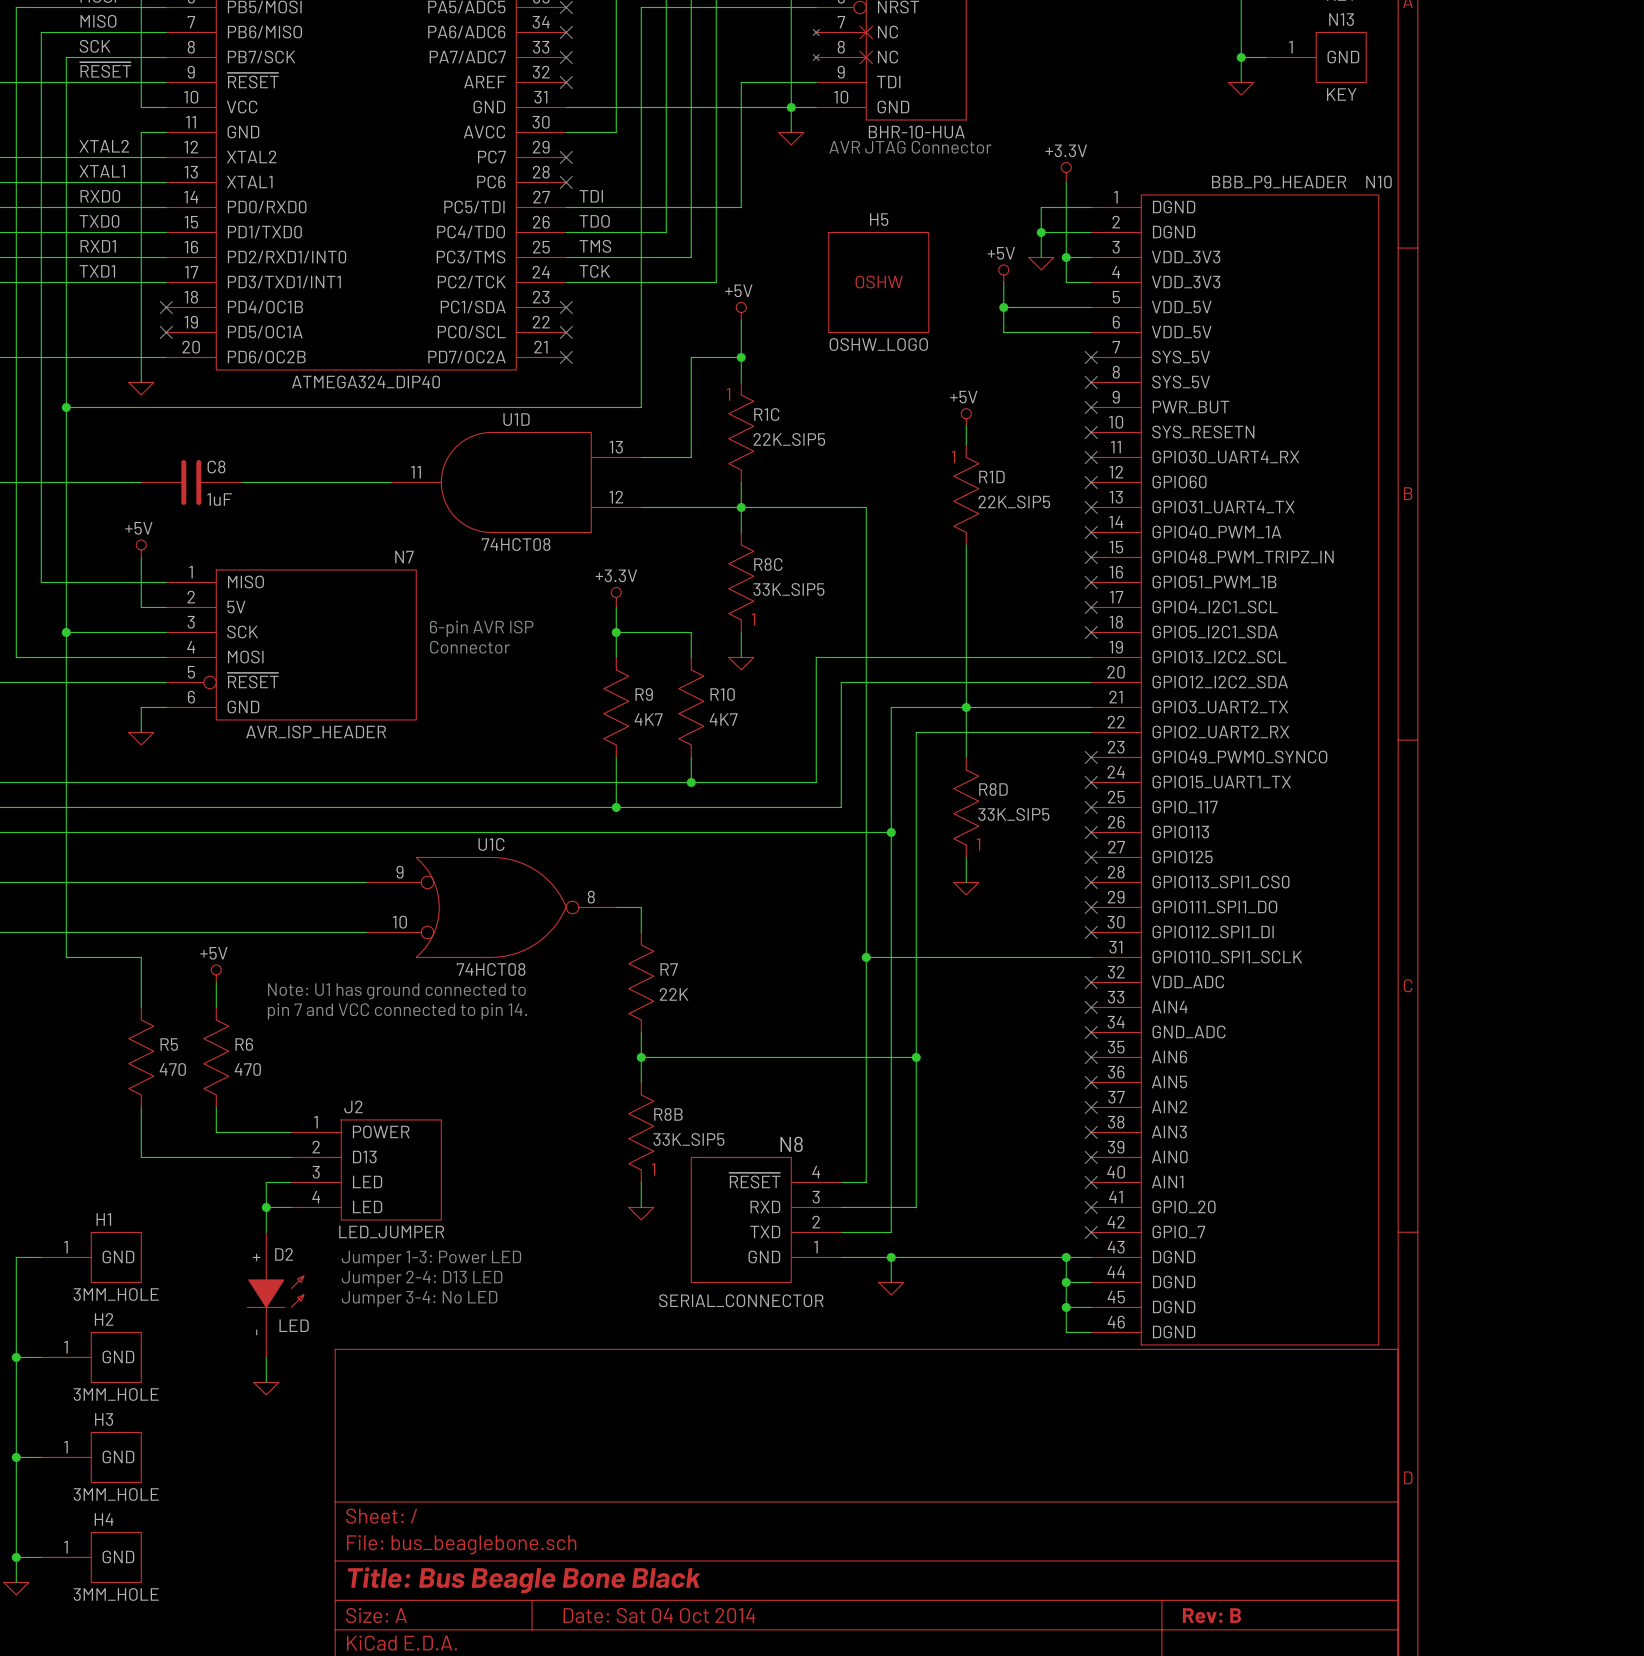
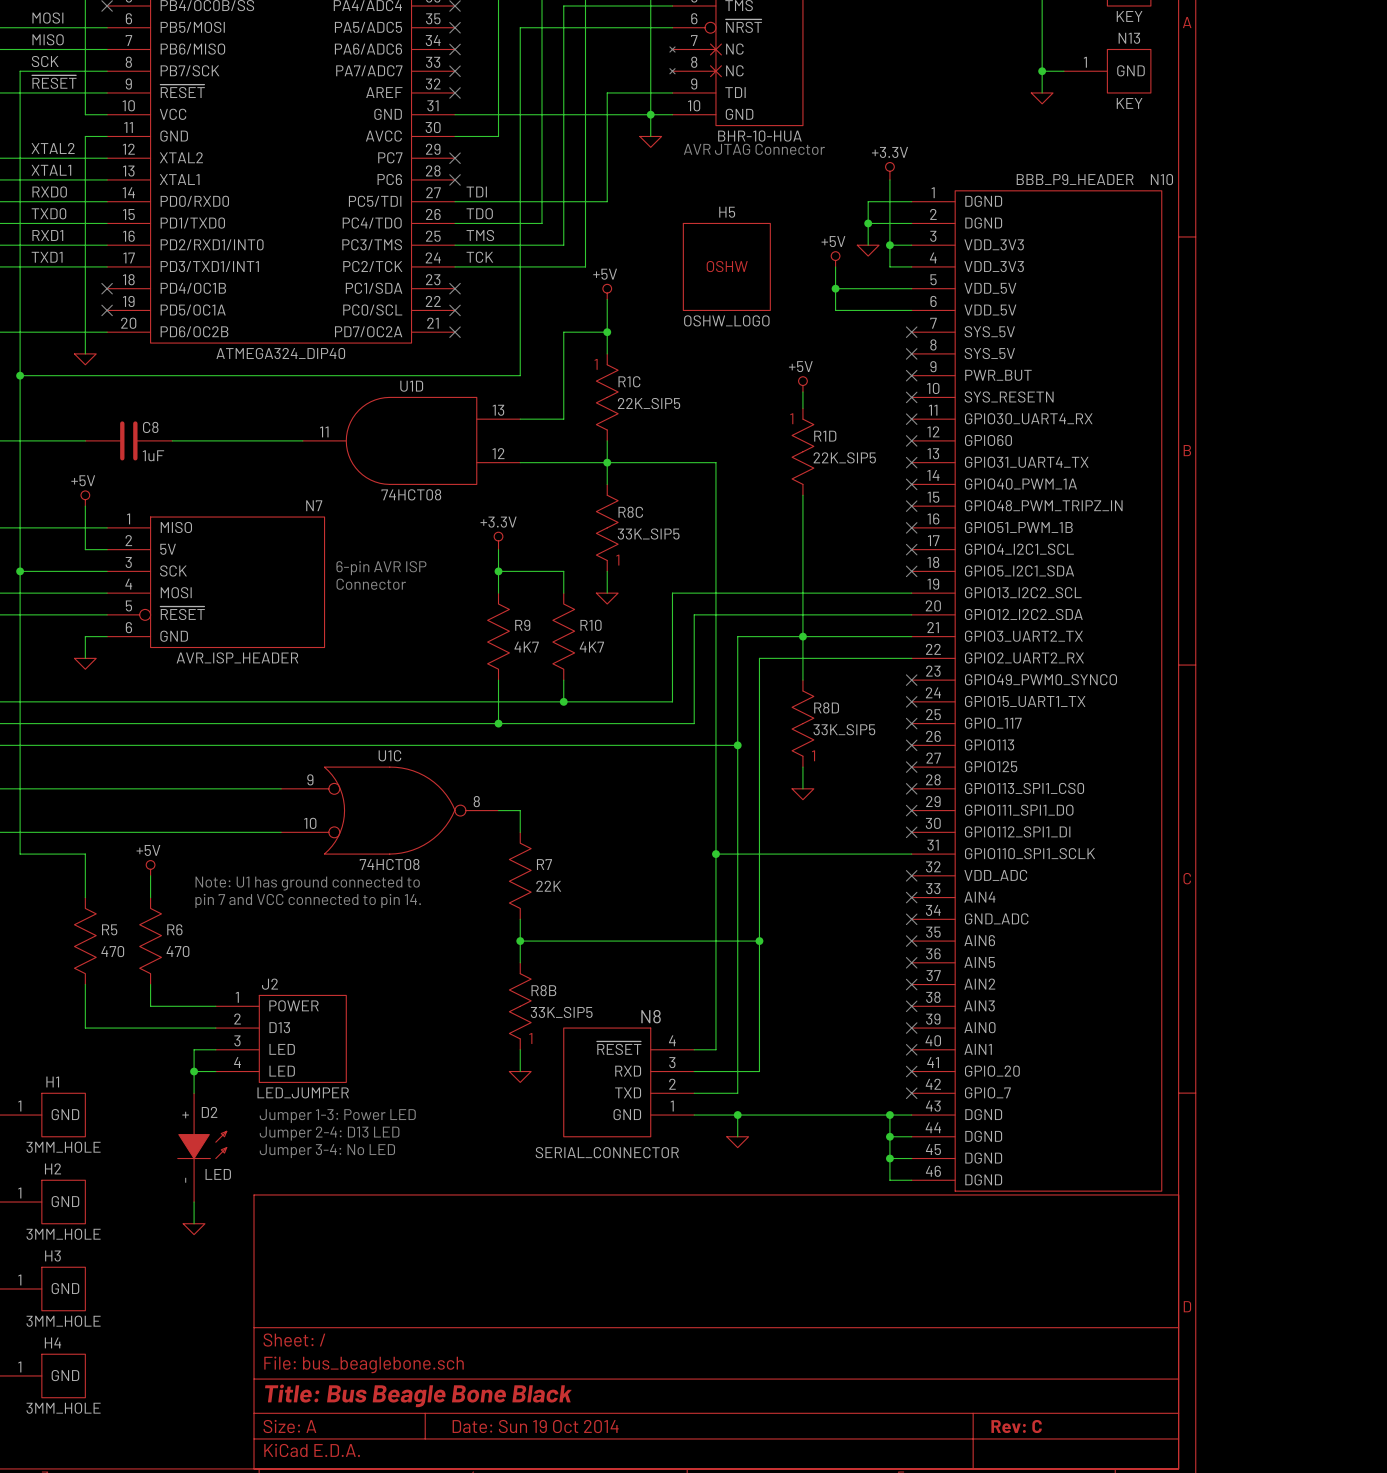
title block: Date: Sat 04 Oct 2014 (659, 1615) -> Date: Sun 19 Oct 2014 (535, 1426)
title block: Rev: B (1211, 1615) -> Rev: C (1016, 1426)

